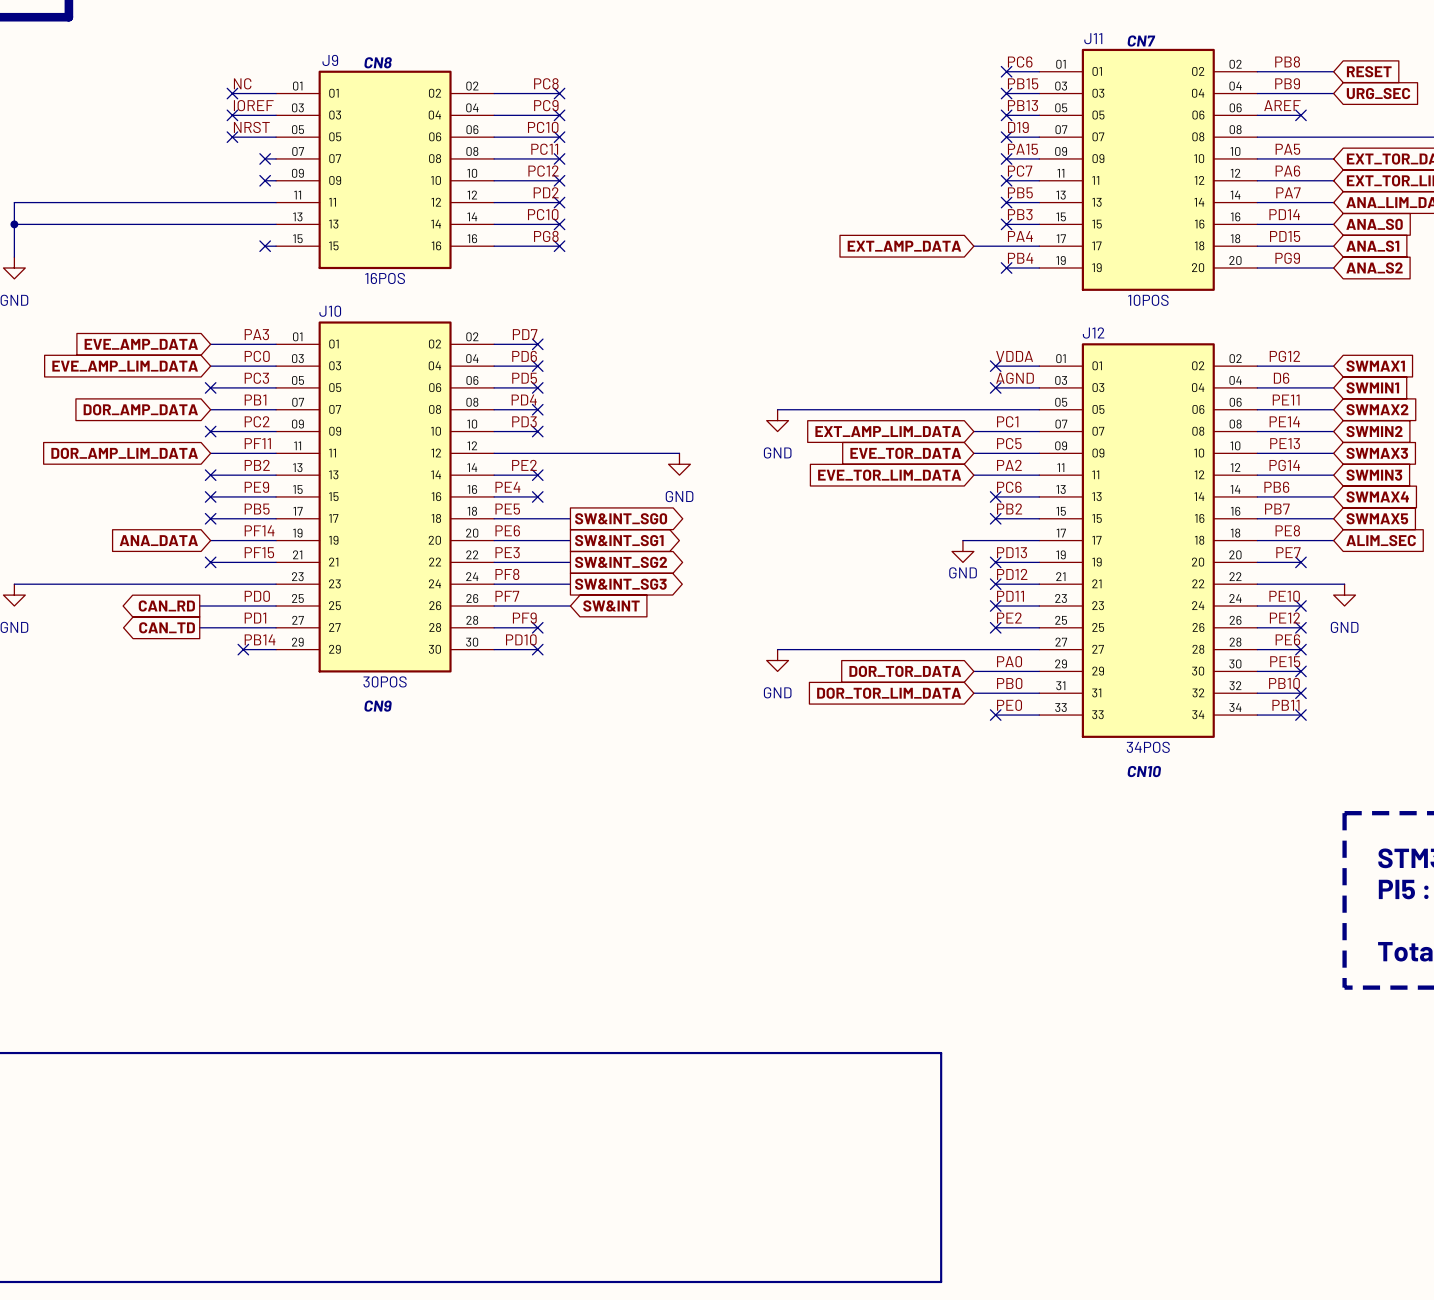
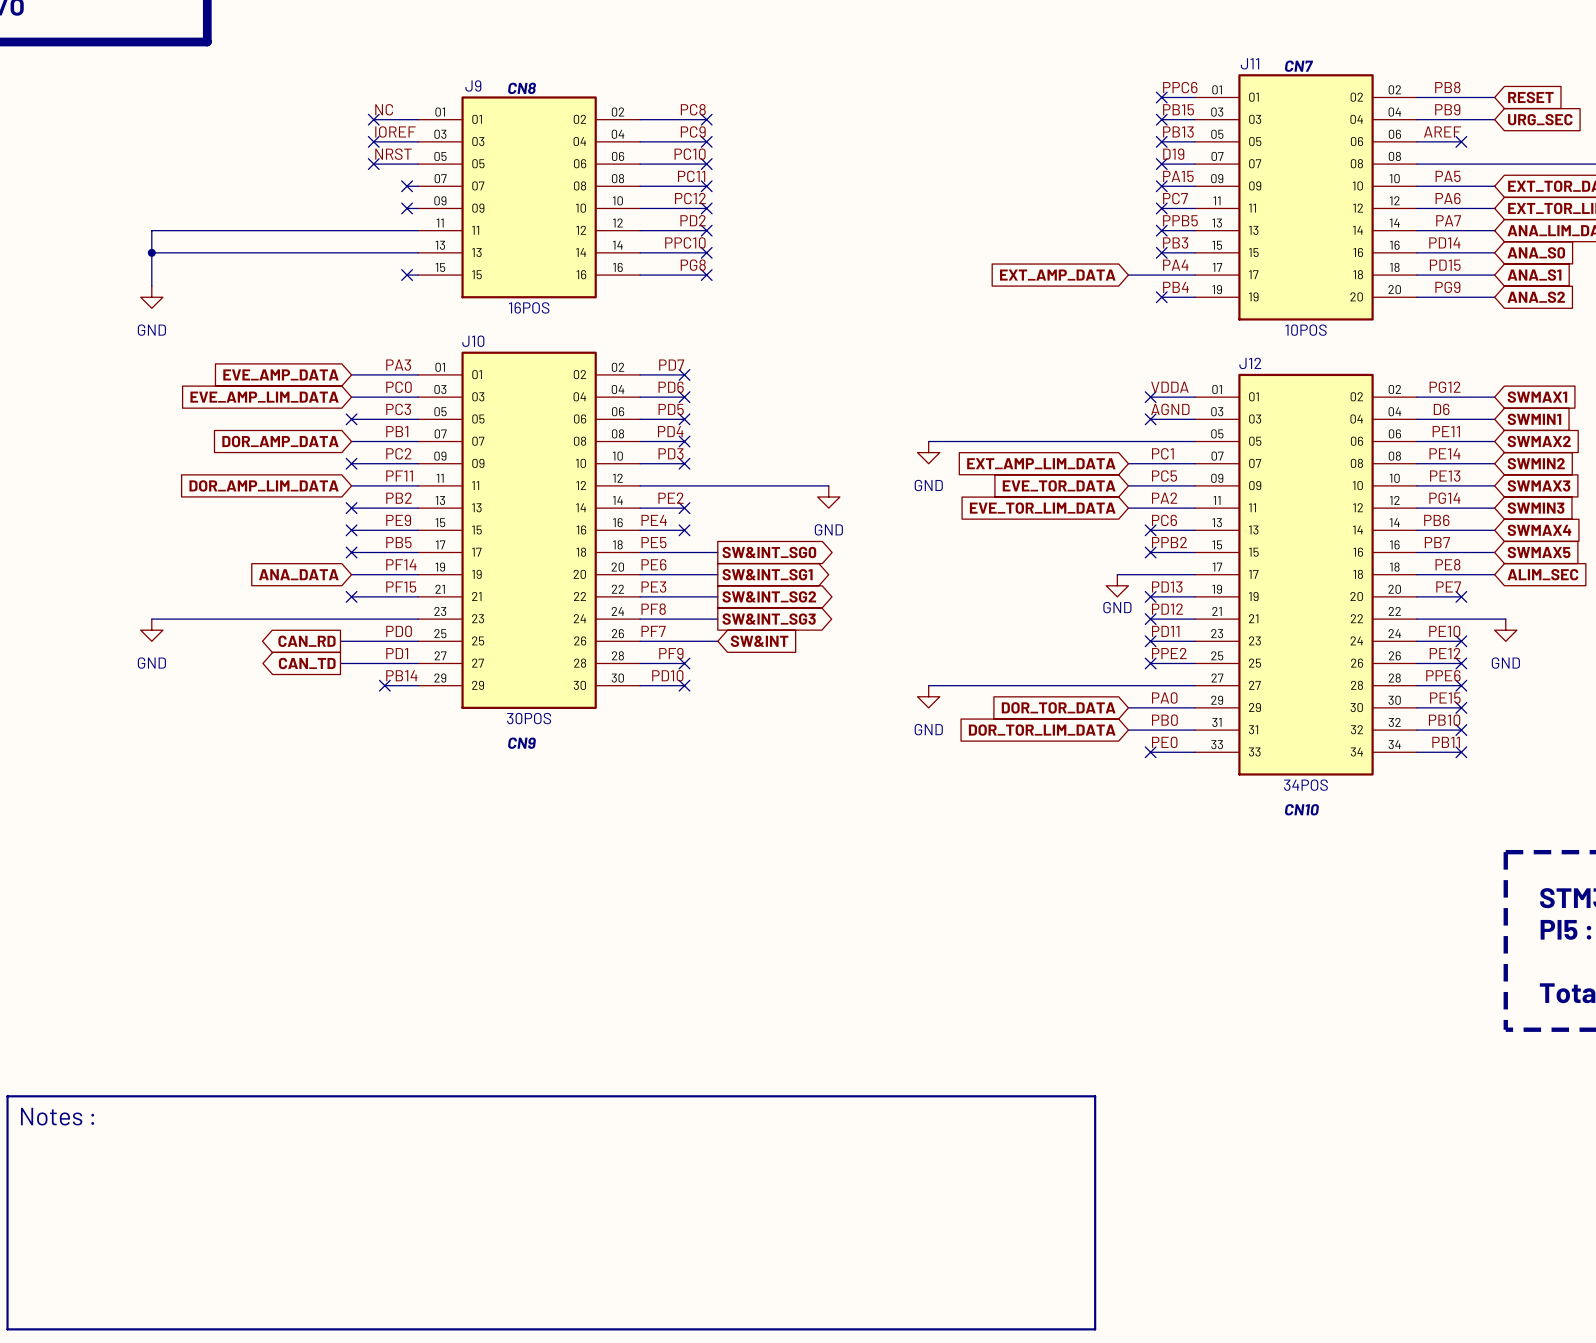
label: PC6 (1020, 62) -> PPC6 (1180, 87)
label: PB5 (1020, 192) -> PPB5 (1180, 220)
label: PC10 (543, 214) -> PPC10 (685, 242)
label: PB2 (1009, 508) -> PPB2 (1169, 542)
label: PE2 (1009, 618) -> PPE2 (1169, 653)
label: PE6 (1287, 639) -> PPE6 (1443, 675)

